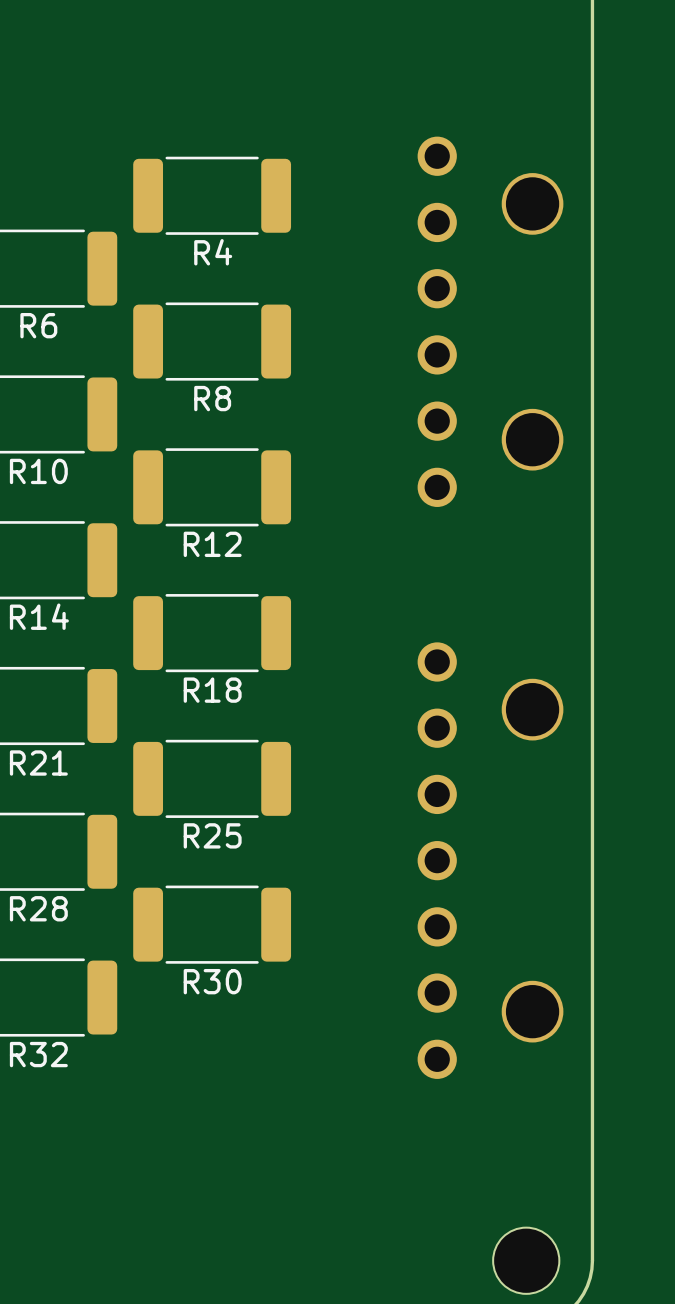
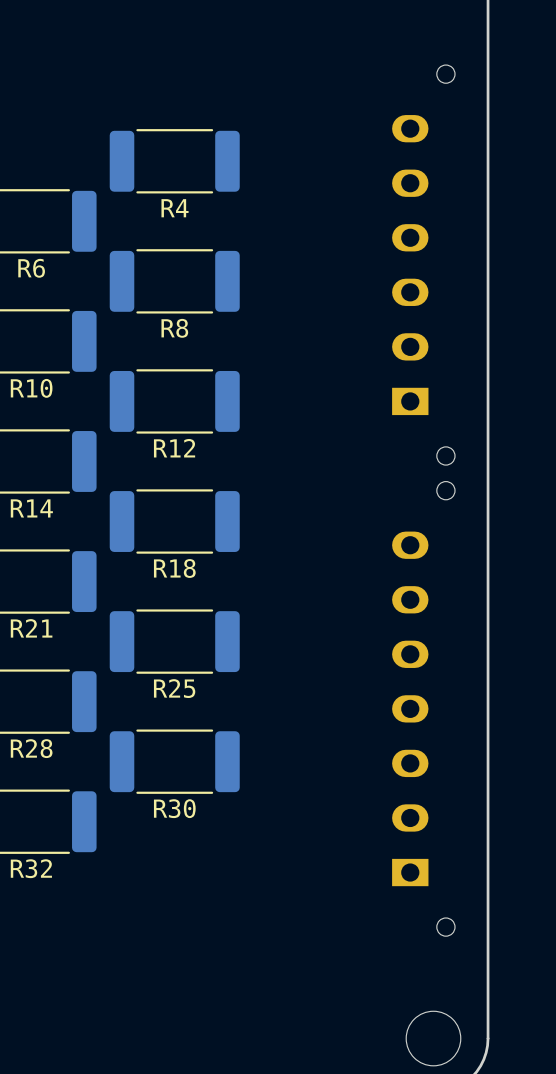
part: (490, 321) -> none
part: none -> (423, 265)
part: (490, 860) -> none
part: none -> (423, 708)

